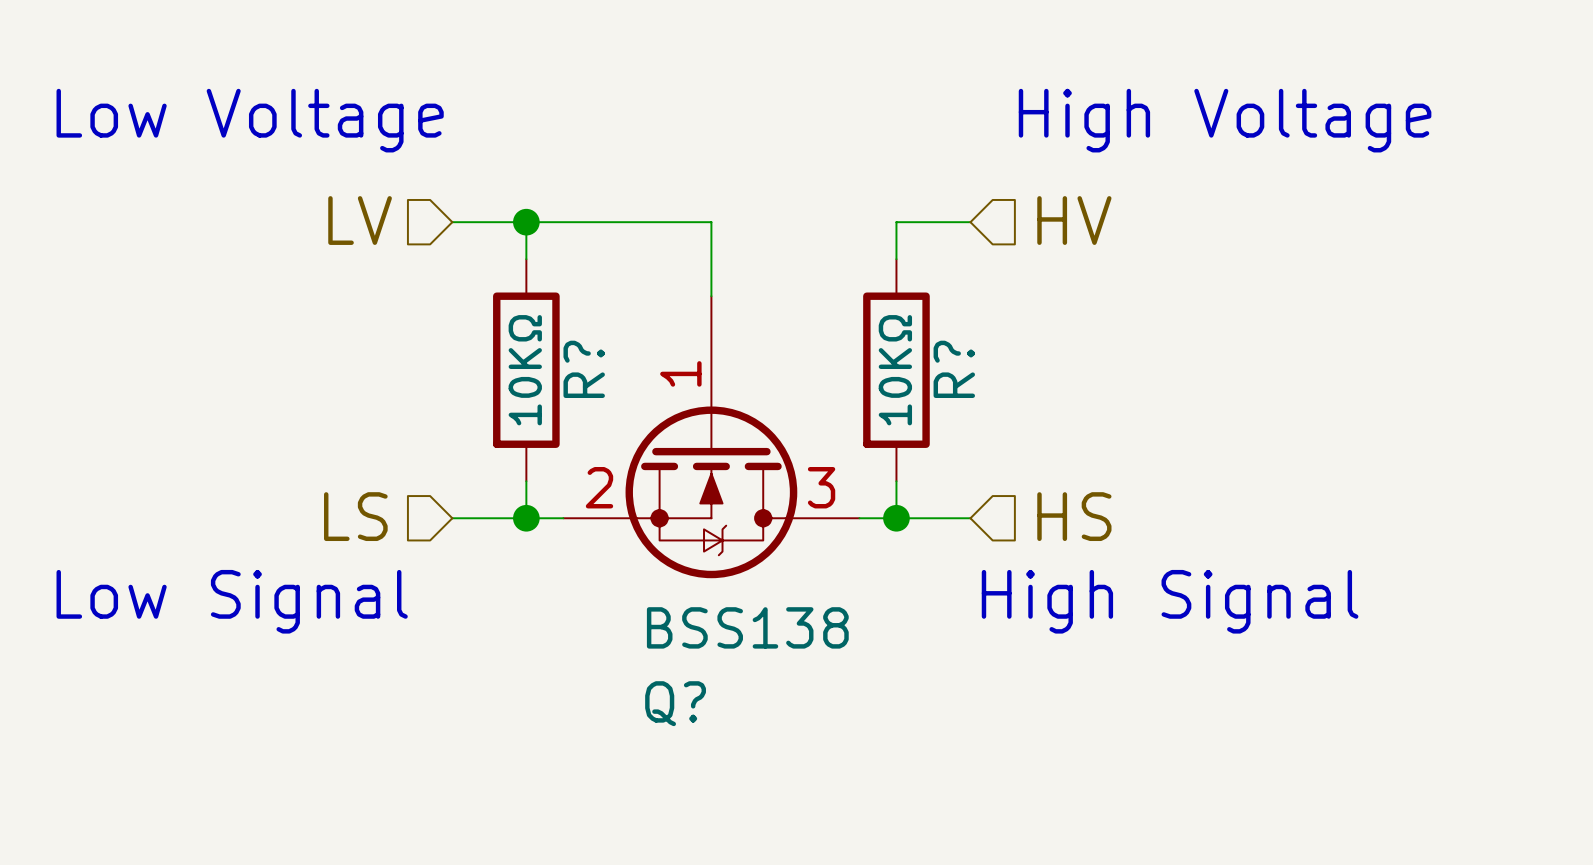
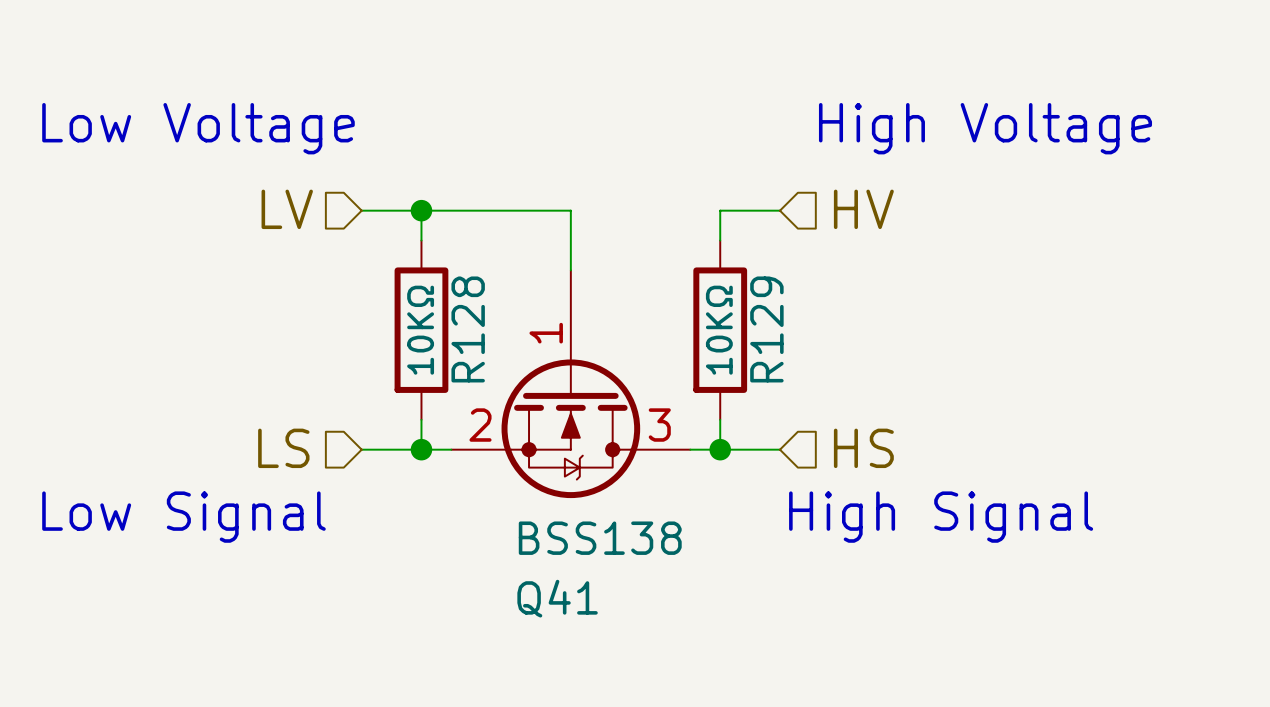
R? name: R? (584, 369) -> R128 (468, 329)
R? name: R? (954, 369) -> R129 (766, 329)
Q? name: Q? (675, 703) -> Q41 (557, 598)

